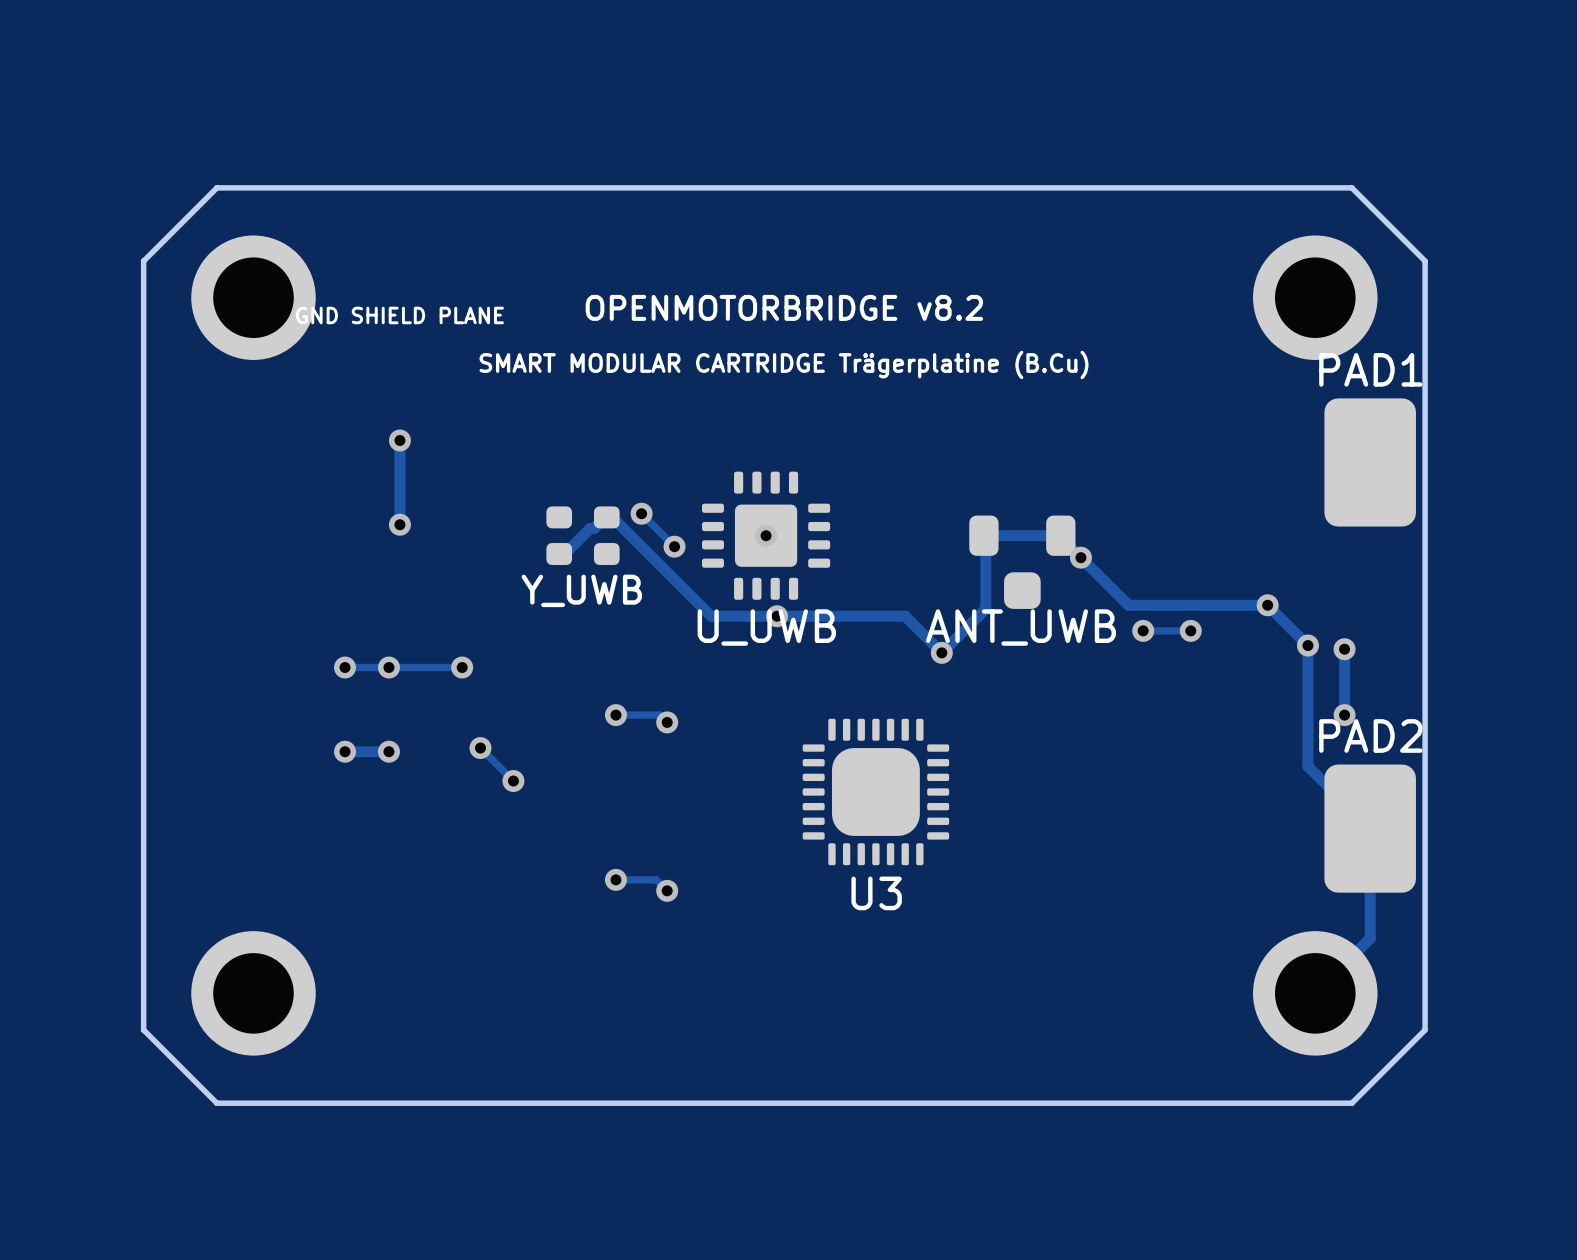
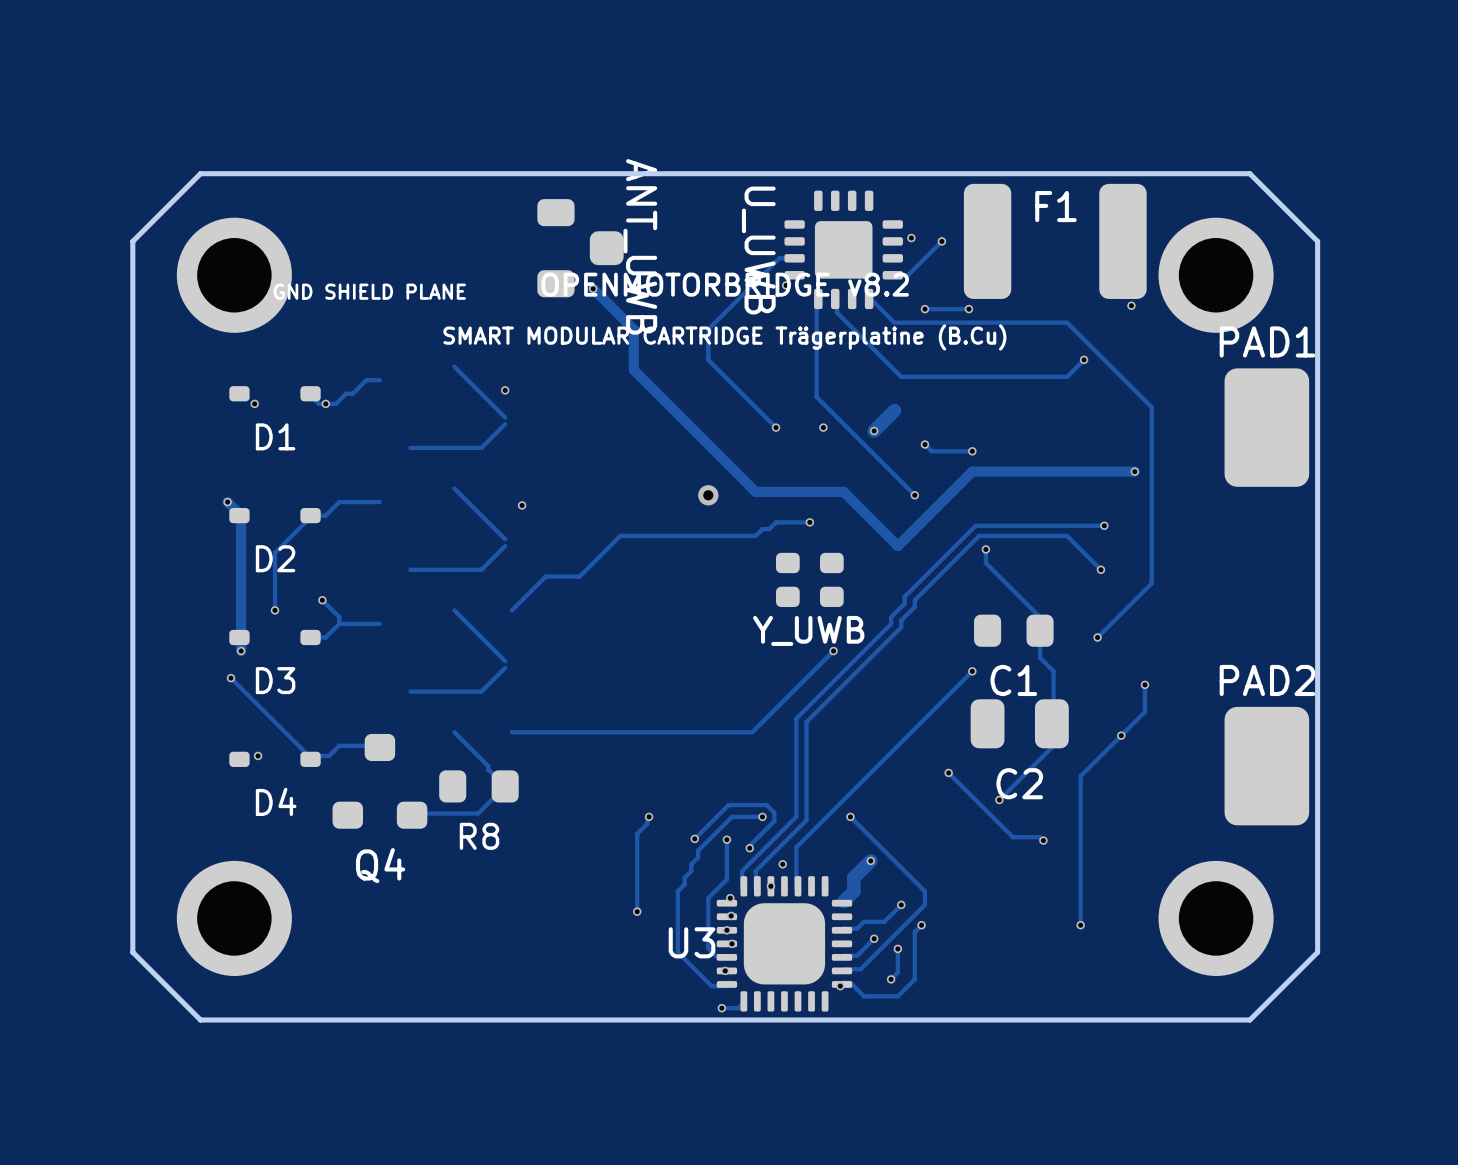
via: none -> (911, 238)
track: none -> (941, 241) (908, 275) (891, 275)
via: none -> (941, 241)
F1: none -> (1055, 241)
track: none -> (796, 258) (779, 258) (708, 329) (708, 359) (776, 427)
via: none -> (786, 285)
track: none -> (593, 288) (633, 329) (633, 370) (755, 491) (843, 491) (897, 546) (972, 471) (1134, 471)
via: none -> (593, 288)
track: none -> (816, 298) (816, 397) (914, 495)
track: none -> (836, 298) (836, 312) (901, 376) (1067, 376) (1084, 359)
track: none -> (870, 298) (894, 322) (1067, 322) (1151, 407) (1151, 583) (1097, 637)
via: none -> (1131, 305)
via: none -> (924, 309)
via: none -> (968, 309)
via: none -> (1084, 359)
track: none -> (454, 366) (505, 417)
track: none -> (379, 380) (366, 380) (352, 393) (346, 393) (335, 403) (319, 403) (308, 393)
via: none -> (505, 390)
D1: none -> (274, 393)
via: none -> (254, 403)
via: none -> (325, 403)
track: (399, 440) (399, 524) -> none
via: (399, 440) -> none
track: none -> (894, 410) (874, 430)
track: none -> (505, 424) (481, 447) (410, 447)
via: none -> (776, 427)
via: none -> (823, 427)
via: none -> (874, 430)
track: none -> (924, 444) (931, 451) (972, 451)
via: none -> (924, 444)
via: none -> (972, 451)
via: none -> (1134, 471)
track: (641, 513) (674, 546) -> none
via: (641, 513) -> none
track: (604, 517) (593, 528) (590, 528) (564, 554) -> none
track: (612, 517) (711, 616) (905, 616) (941, 652) (985, 608) (985, 535) (1058, 535) (1128, 605) (1267, 605) (1307, 645) (1307, 766) (1370, 828) (1370, 938) (1315, 993) -> none
via: (399, 524) -> none
track: none -> (454, 488) (505, 539)
Y_UWB position: (583, 535) -> (809, 579)
U_UWB position: (766, 535) -> (843, 249)
via: none -> (914, 495)
track: none -> (227, 502) (241, 515) (241, 651)
via: none -> (227, 502)
track: none -> (379, 502) (339, 502) (325, 515) (308, 515)
via: none -> (522, 505)
via: (674, 546) -> none
D2: none -> (274, 515)
via: (1080, 557) -> none
track: none -> (308, 518) (274, 552) (274, 610)
ANT_UWB rotation: 0° (1022, 562) -> 90° counterclockwise (580, 248)
ANT_UWB position: (1022, 562) -> (580, 248)
track: none -> (809, 522) (776, 522) (769, 529) (762, 529) (755, 535) (620, 535) (579, 576) (545, 576) (511, 610)
via: none -> (809, 522)
track: none -> (1104, 525) (975, 525) (904, 596) (904, 603) (891, 617) (891, 623) (796, 718) (796, 816) (742, 871) (742, 887) (743, 886)
via: none -> (1104, 525)
track: none -> (505, 546) (481, 569) (410, 569)
track: none -> (985, 549) (985, 563) (1040, 617)
via: none -> (985, 549)
via: (1267, 605) -> none
via: (777, 616) -> none
track: none -> (1100, 569) (1067, 535) (979, 535) (914, 600) (914, 607) (901, 620) (901, 627) (806, 722) (806, 820) (755, 871) (755, 887) (757, 886)
via size: [1179, 619, 1202, 642] -> [1096, 565, 1106, 575]
U_UWB name rotation: 0° (766, 627) -> 90° clockwise (758, 250)
via: (1143, 630) -> none
track: (1190, 630) (1143, 630) -> (968, 309) (924, 309)
via: (1307, 645) -> none
track: none -> (322, 600) (339, 617) (339, 623)
via: none -> (322, 600)
track: (1344, 649) (1344, 715) -> none
via: (1344, 649) -> none
via: (941, 652) -> none
via: none -> (274, 610)
track: none -> (454, 610) (505, 661)
via: (345, 667) -> none
via: (388, 667) -> none
track: (462, 667) (345, 667) -> none
via: (462, 667) -> none
track: none -> (339, 623) (325, 637) (308, 637)
C1: none -> (1013, 630)
track: none -> (1040, 630) (1040, 657) (1053, 671) (1053, 725)
D3: none -> (274, 637)
via: none -> (1097, 637)
via: none -> (241, 651)
track: none -> (833, 651) (752, 732) (511, 732)
via: none -> (833, 651)
track: (615, 715) (659, 715) (667, 722) -> none
via: (615, 715) -> none
via: (1344, 715) -> none
track: none -> (505, 667) (481, 691) (410, 691)
via: (667, 722) -> none
track: none -> (972, 671) (796, 847) (796, 887) (798, 886)
via: none -> (972, 671)
track: none -> (230, 678) (308, 755) (329, 755) (339, 745) (379, 745)
via: none -> (230, 678)
track: none -> (1144, 684) (1144, 711) (1080, 776) (1080, 925)
via: none -> (1144, 684)
track: (480, 748) (513, 781) -> none
via: (480, 748) -> none
via: (345, 751) -> none
track: (388, 751) (345, 751) -> (379, 623) (339, 623)
via: (388, 751) -> none
via: (513, 781) -> none
C2: none -> (1019, 723)
track: none -> (454, 732) (488, 766) (488, 769) (505, 786) (478, 813) (420, 813)
U3 position: (875, 791) -> (784, 943)
via: none -> (1121, 735)
track: none -> (1053, 745) (999, 799)
via: none -> (258, 755)
D4: none -> (274, 759)
track: none -> (948, 772) (1012, 837) (1040, 837) (1043, 840)
via: none -> (948, 772)
Q4: none -> (379, 781)
R8: none -> (478, 786)
via: none -> (999, 799)
track: (615, 879) (656, 879) (667, 890) -> none
via: (615, 879) -> none
track: none -> (647, 816) (647, 823) (637, 833) (637, 911)
via: none -> (649, 816)
track: none -> (762, 816) (731, 816) (698, 850) (698, 857) (691, 864) (691, 871) (684, 877) (684, 884) (677, 891) (677, 952) (711, 986) (725, 986) (728, 982)
via: none -> (762, 816)
track: none -> (850, 816) (924, 891) (924, 904) (860, 969) (843, 969) (842, 970)
via: none -> (850, 816)
via: (667, 890) -> none
U3 name position: U3 (876, 893) -> U3 (692, 942)
track: none -> (694, 838) (728, 805) (766, 805) (774, 812) (774, 821) (749, 845) (749, 848)
via: none -> (694, 838)
track: none -> (726, 839) (726, 879) (708, 898) (708, 948) (717, 957) (726, 957)
via: none -> (726, 839)
via: none -> (1043, 840)
via: none -> (749, 848)
track: none -> (870, 860) (853, 877) (853, 891) (843, 901)
via: none -> (870, 860)
via: none -> (782, 864)
via: none -> (770, 886)
via: none -> (730, 898)
track: none -> (901, 904) (884, 921) (864, 921) (857, 928) (842, 930)
via: none -> (901, 904)
via: none -> (637, 911)
via: none -> (731, 915)
track: none -> (921, 925) (914, 931) (914, 979) (897, 996) (864, 996) (850, 982) (843, 982) (840, 986)
via: none -> (921, 925)
via: none -> (1080, 925)
via: none -> (726, 930)
track: none -> (874, 938) (857, 955) (842, 957)
via: none -> (874, 938)
via: none -> (731, 943)
track: none -> (897, 948) (897, 972) (891, 979)
via: none -> (897, 948)
via: none -> (725, 970)
via: none -> (891, 979)
via: none -> (840, 986)
track: none -> (743, 1003) (738, 1008) (721, 1008)
via: none -> (721, 1008)

